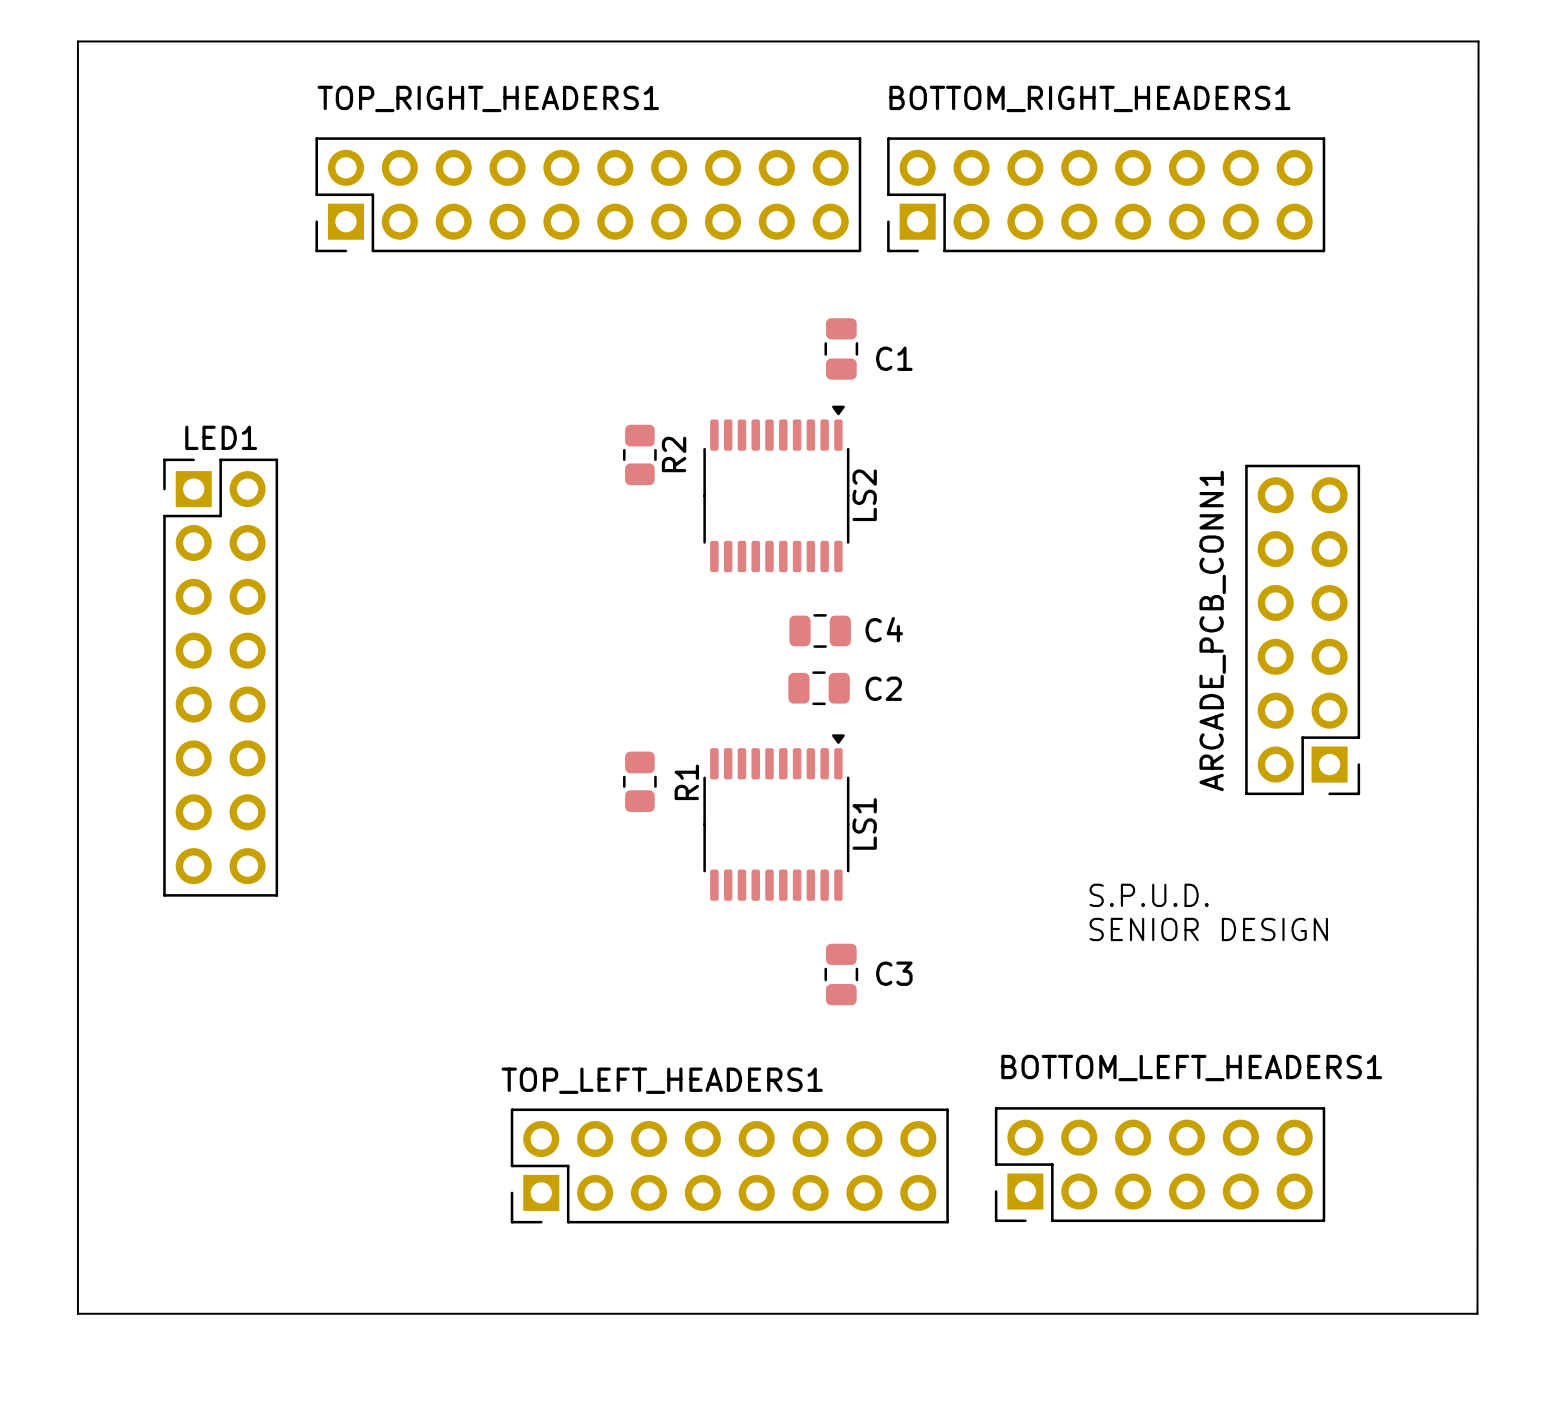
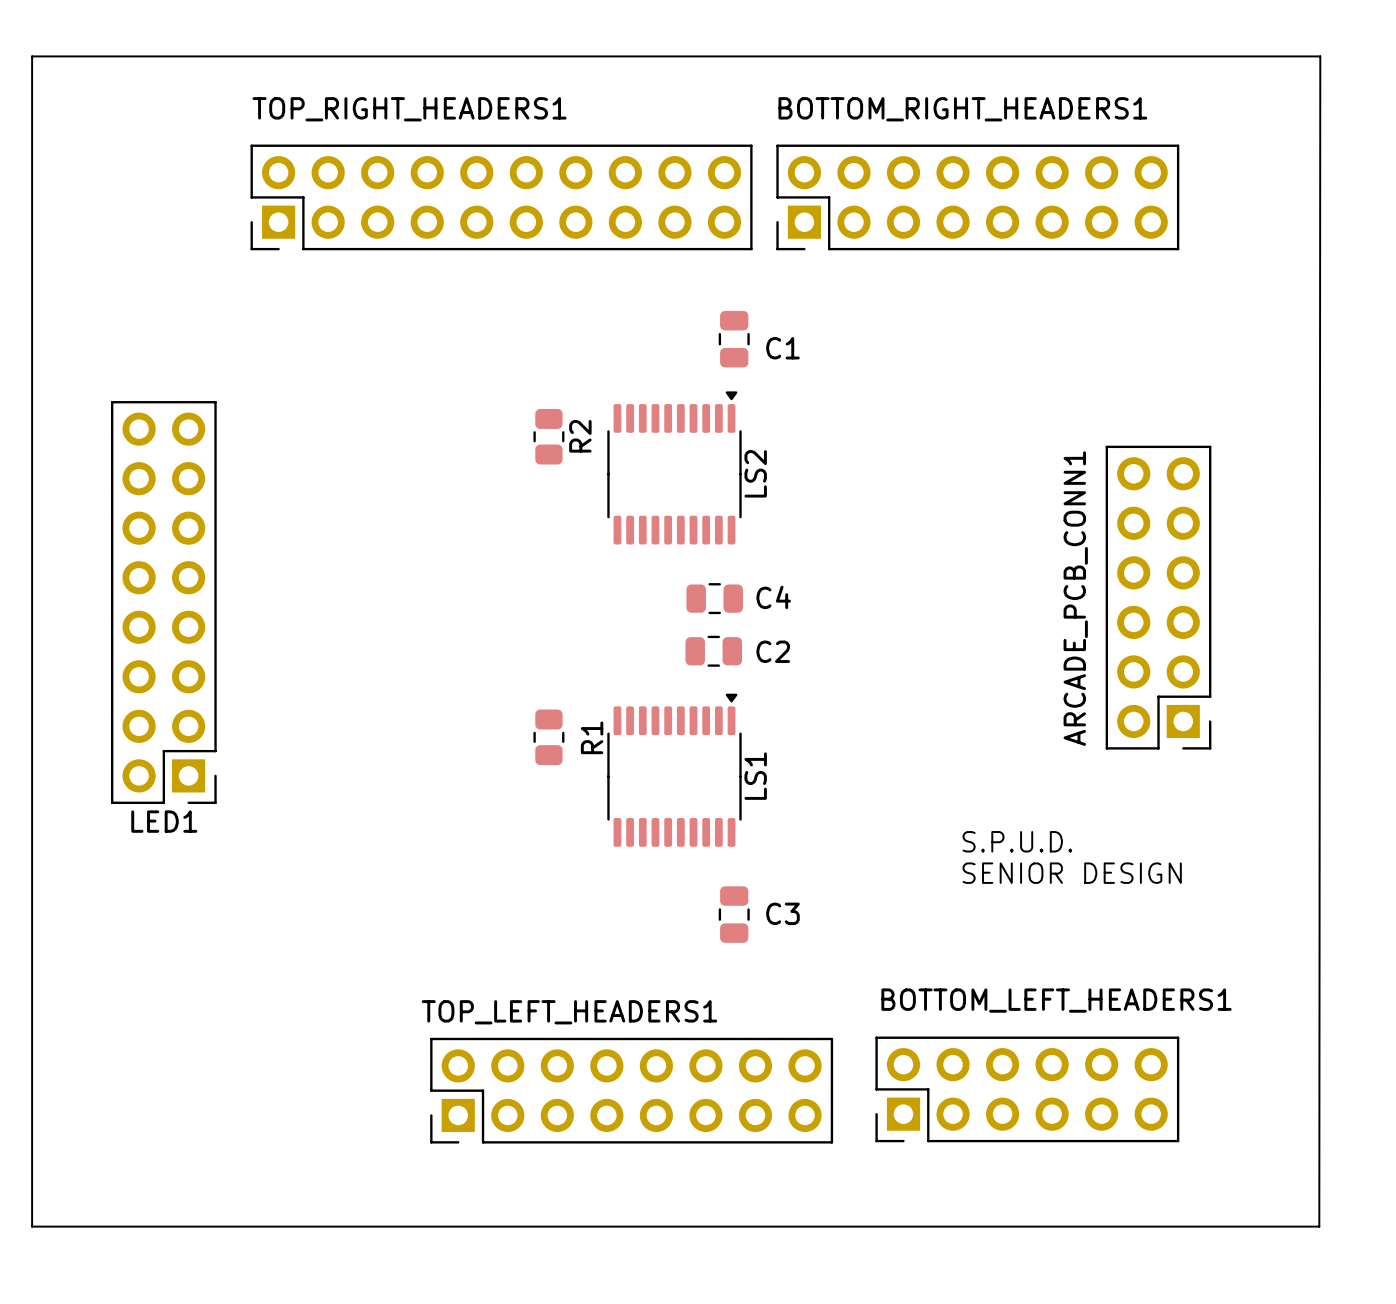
LED1 rotation: 0° (220, 677) -> 180° (163, 602)

